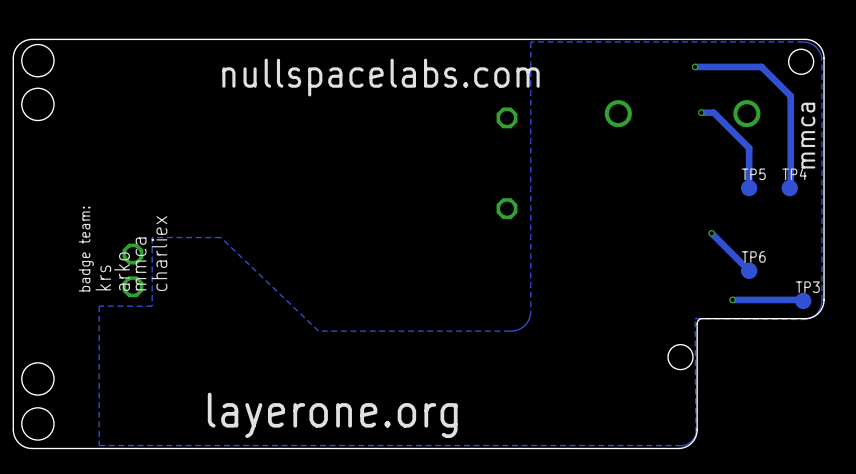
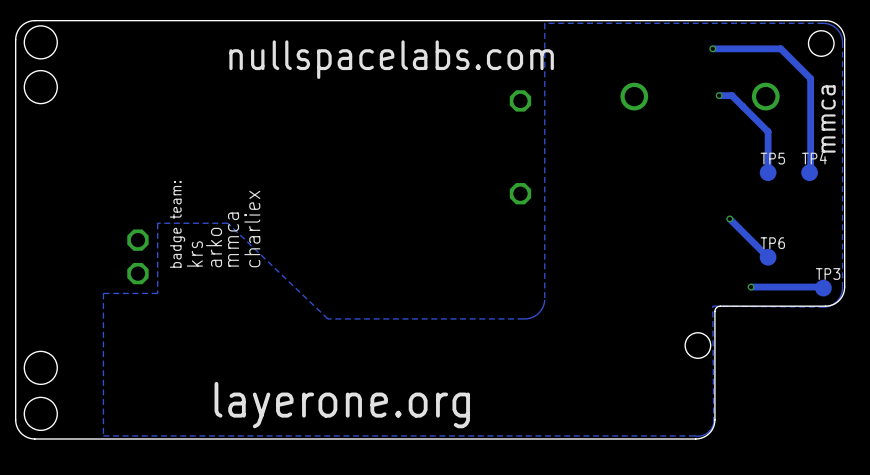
text position: badge team: (86, 249) -> badge team: (177, 224)
text position: charliex (159, 253) -> charliex (252, 229)
text position: mmca (141, 263) -> mmca (233, 239)
text position: arko (122, 271) -> arko (214, 247)
text position: krs (103, 277) -> krs (194, 253)

